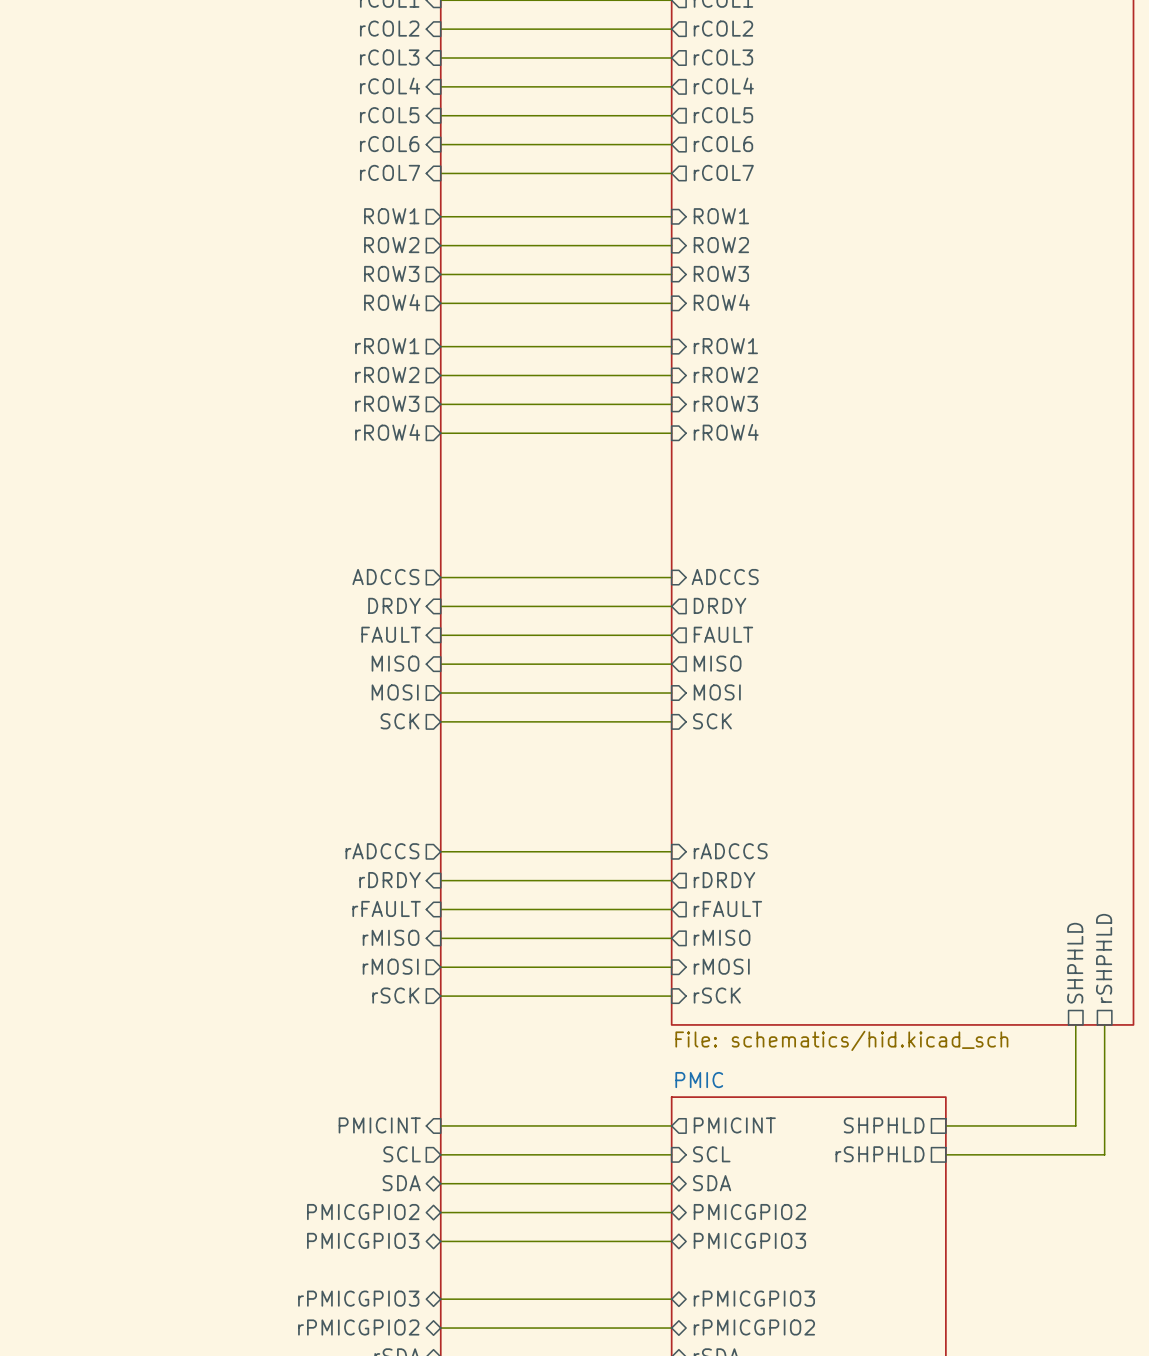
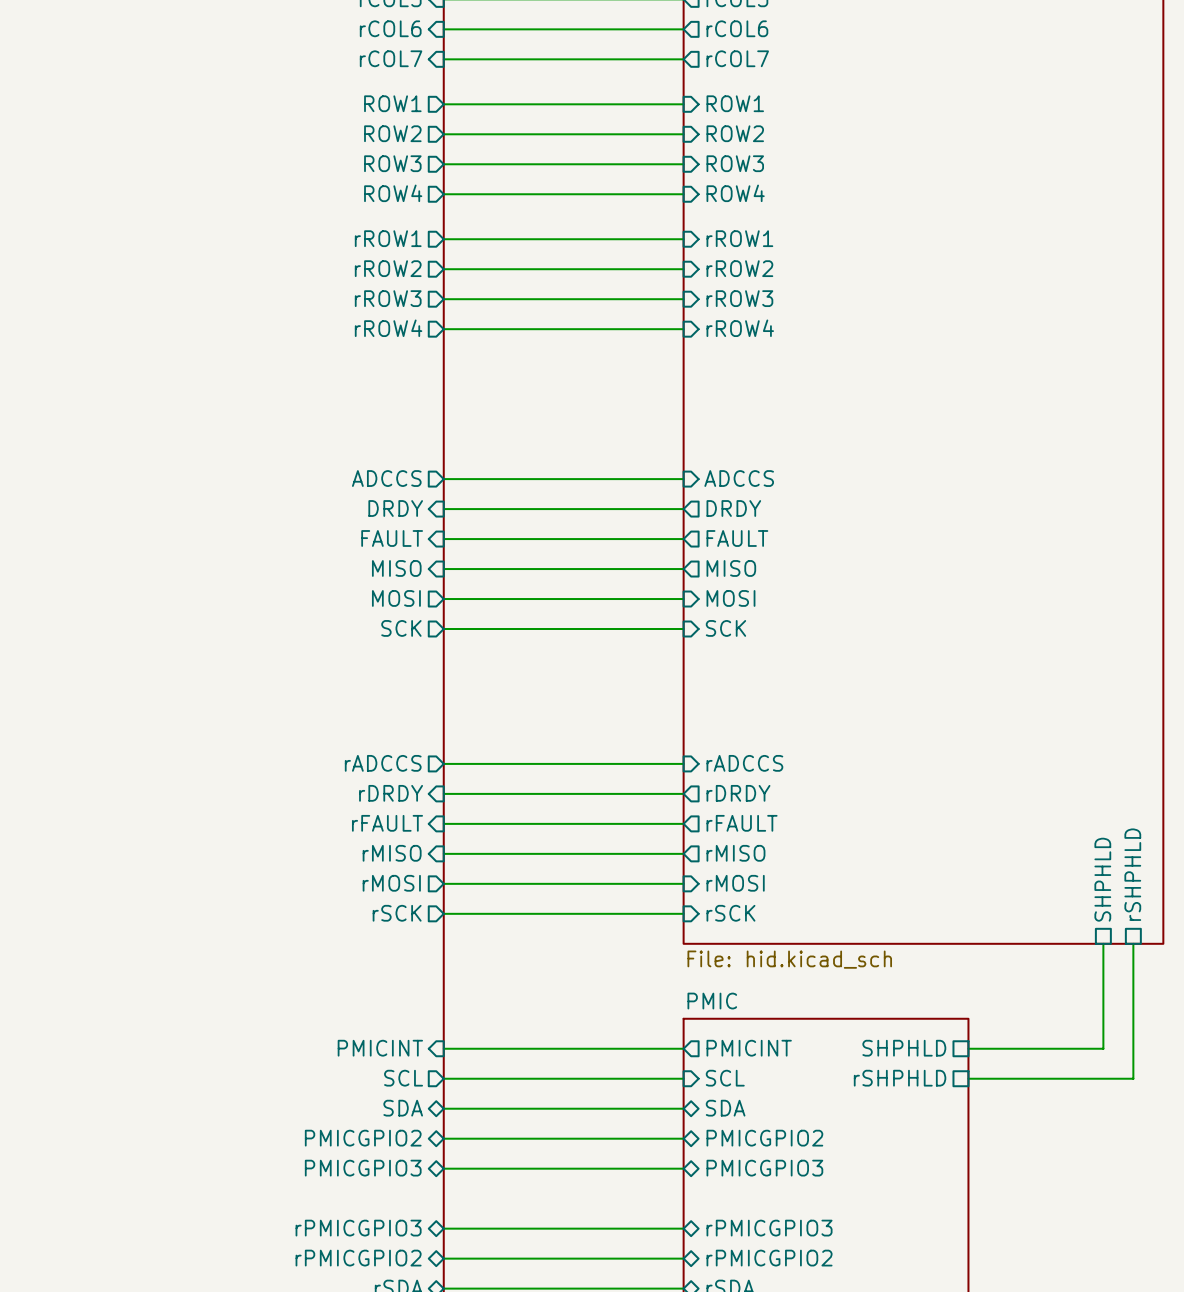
sheet value: File: schematics/hid.kicad_sch (841, 1040) -> File: hid.kicad_sch (789, 959)

